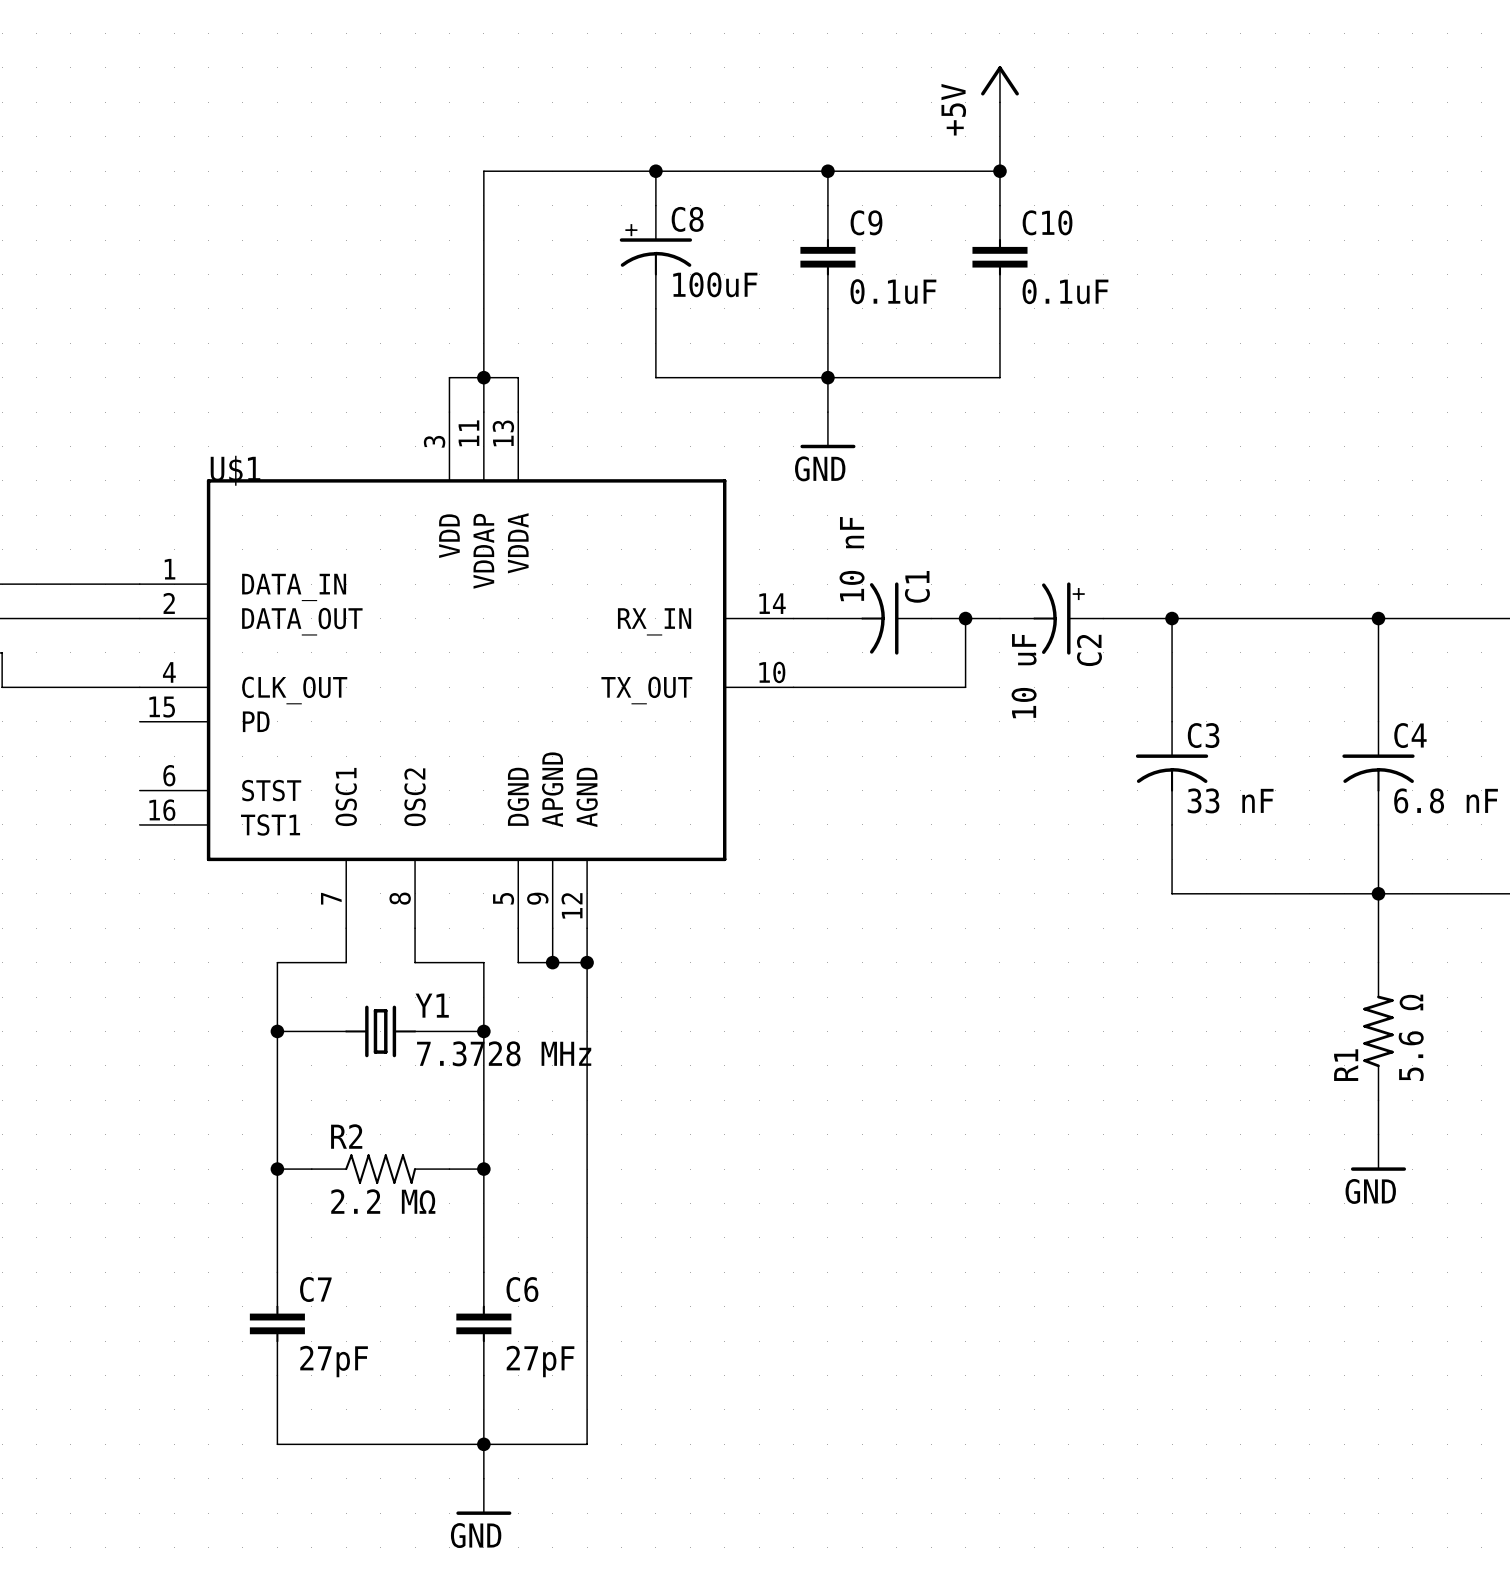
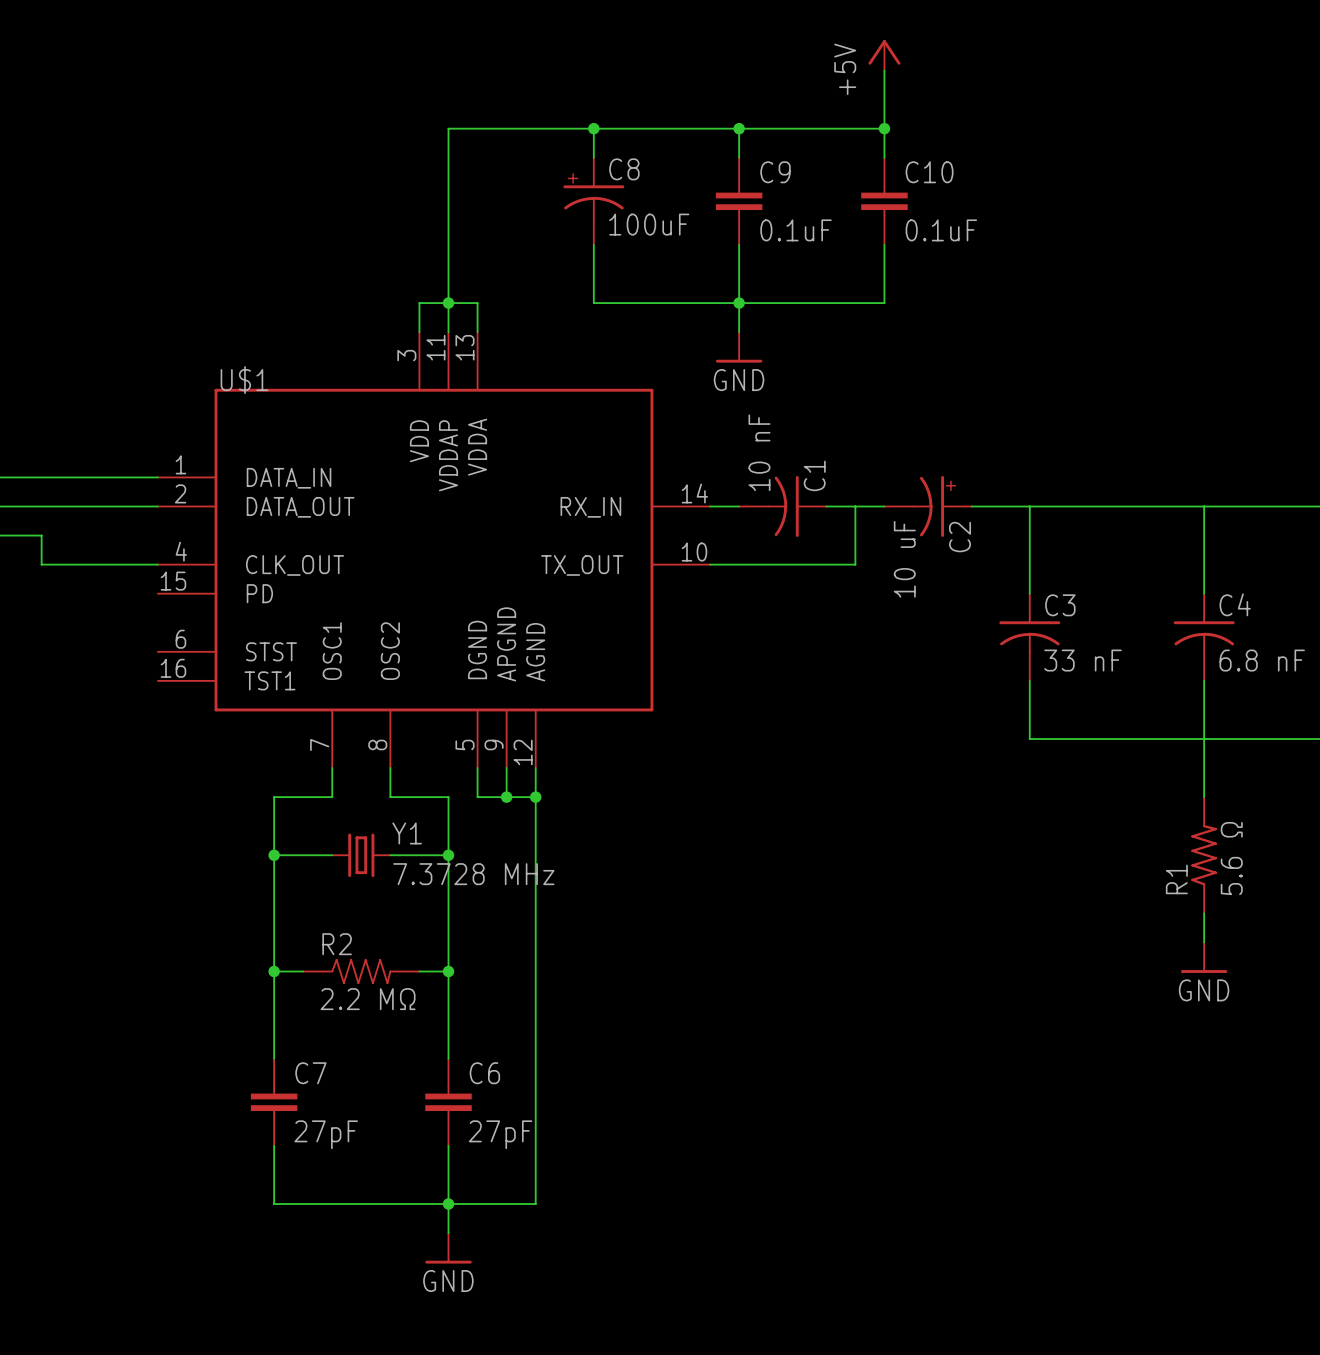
junction: (965, 618) -> none
junction: (1172, 618) -> none
junction: (1378, 618) -> none
junction: (1378, 893) -> none

